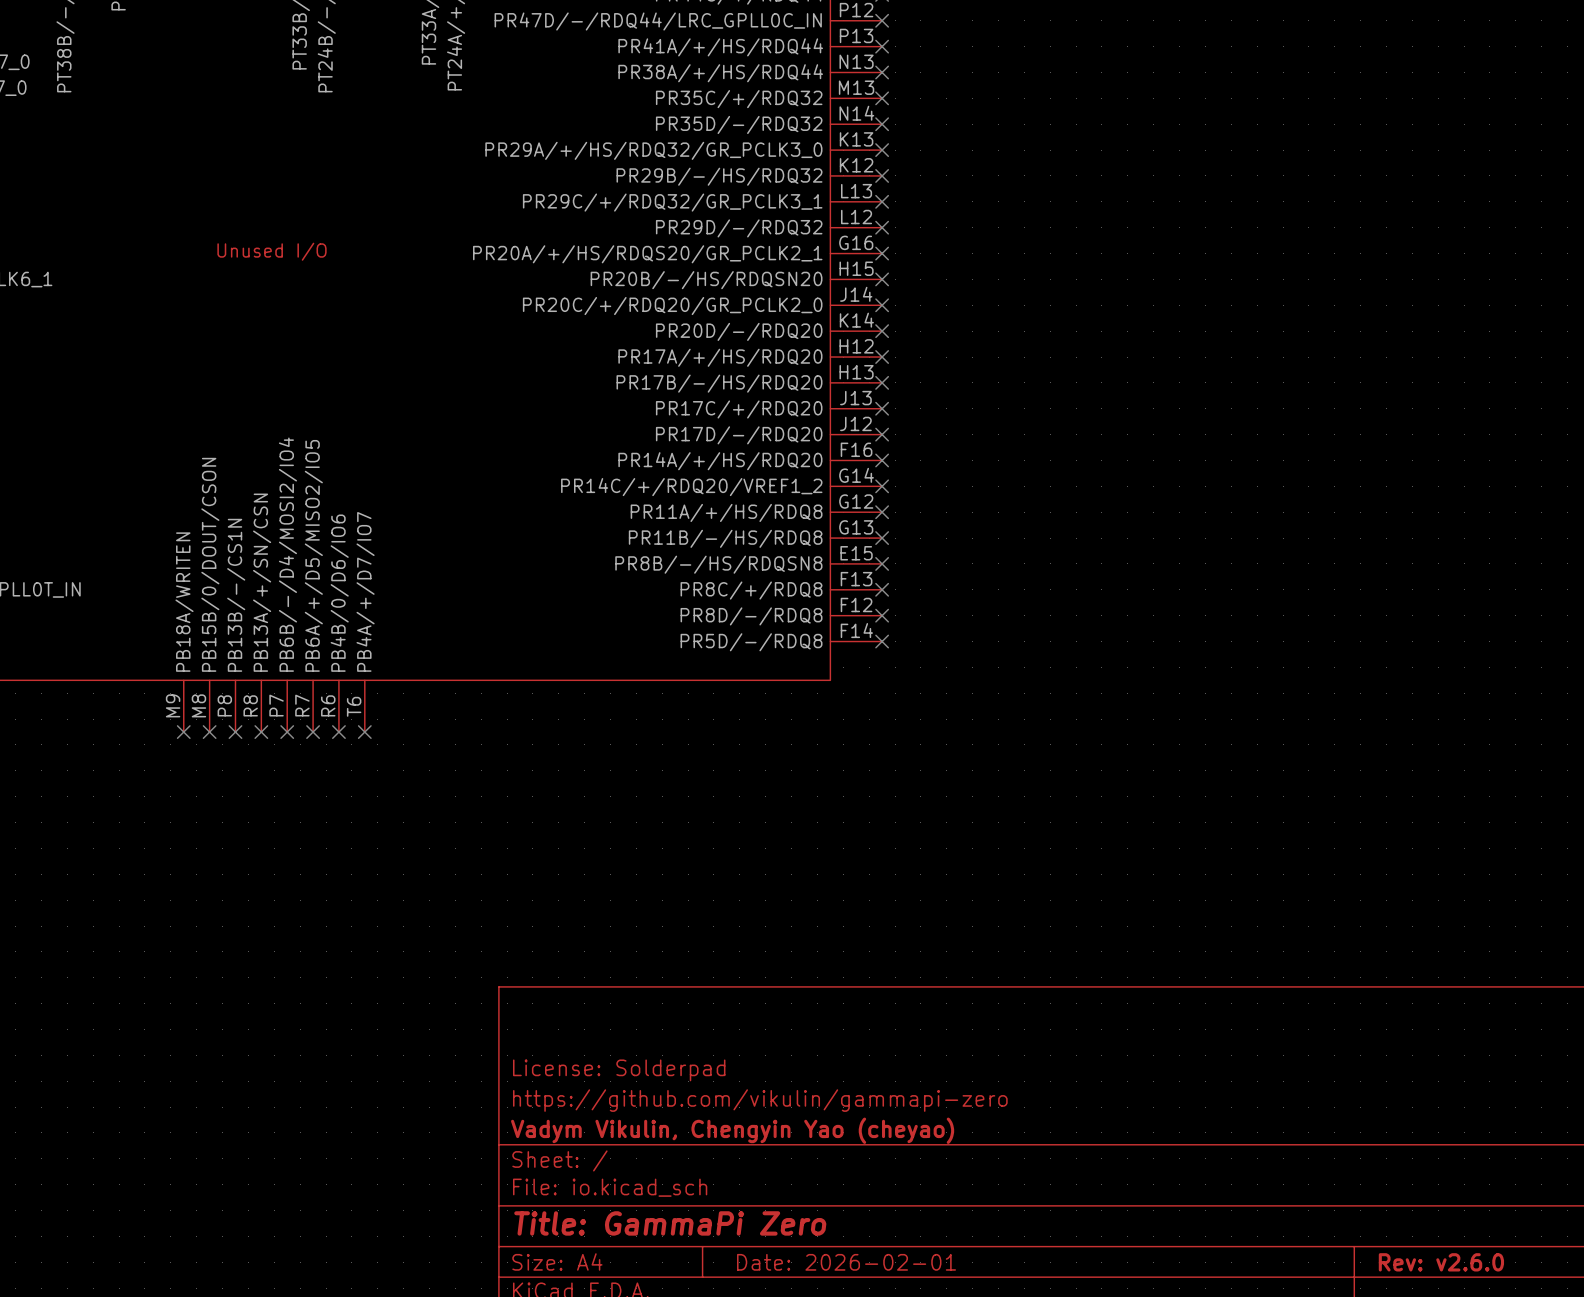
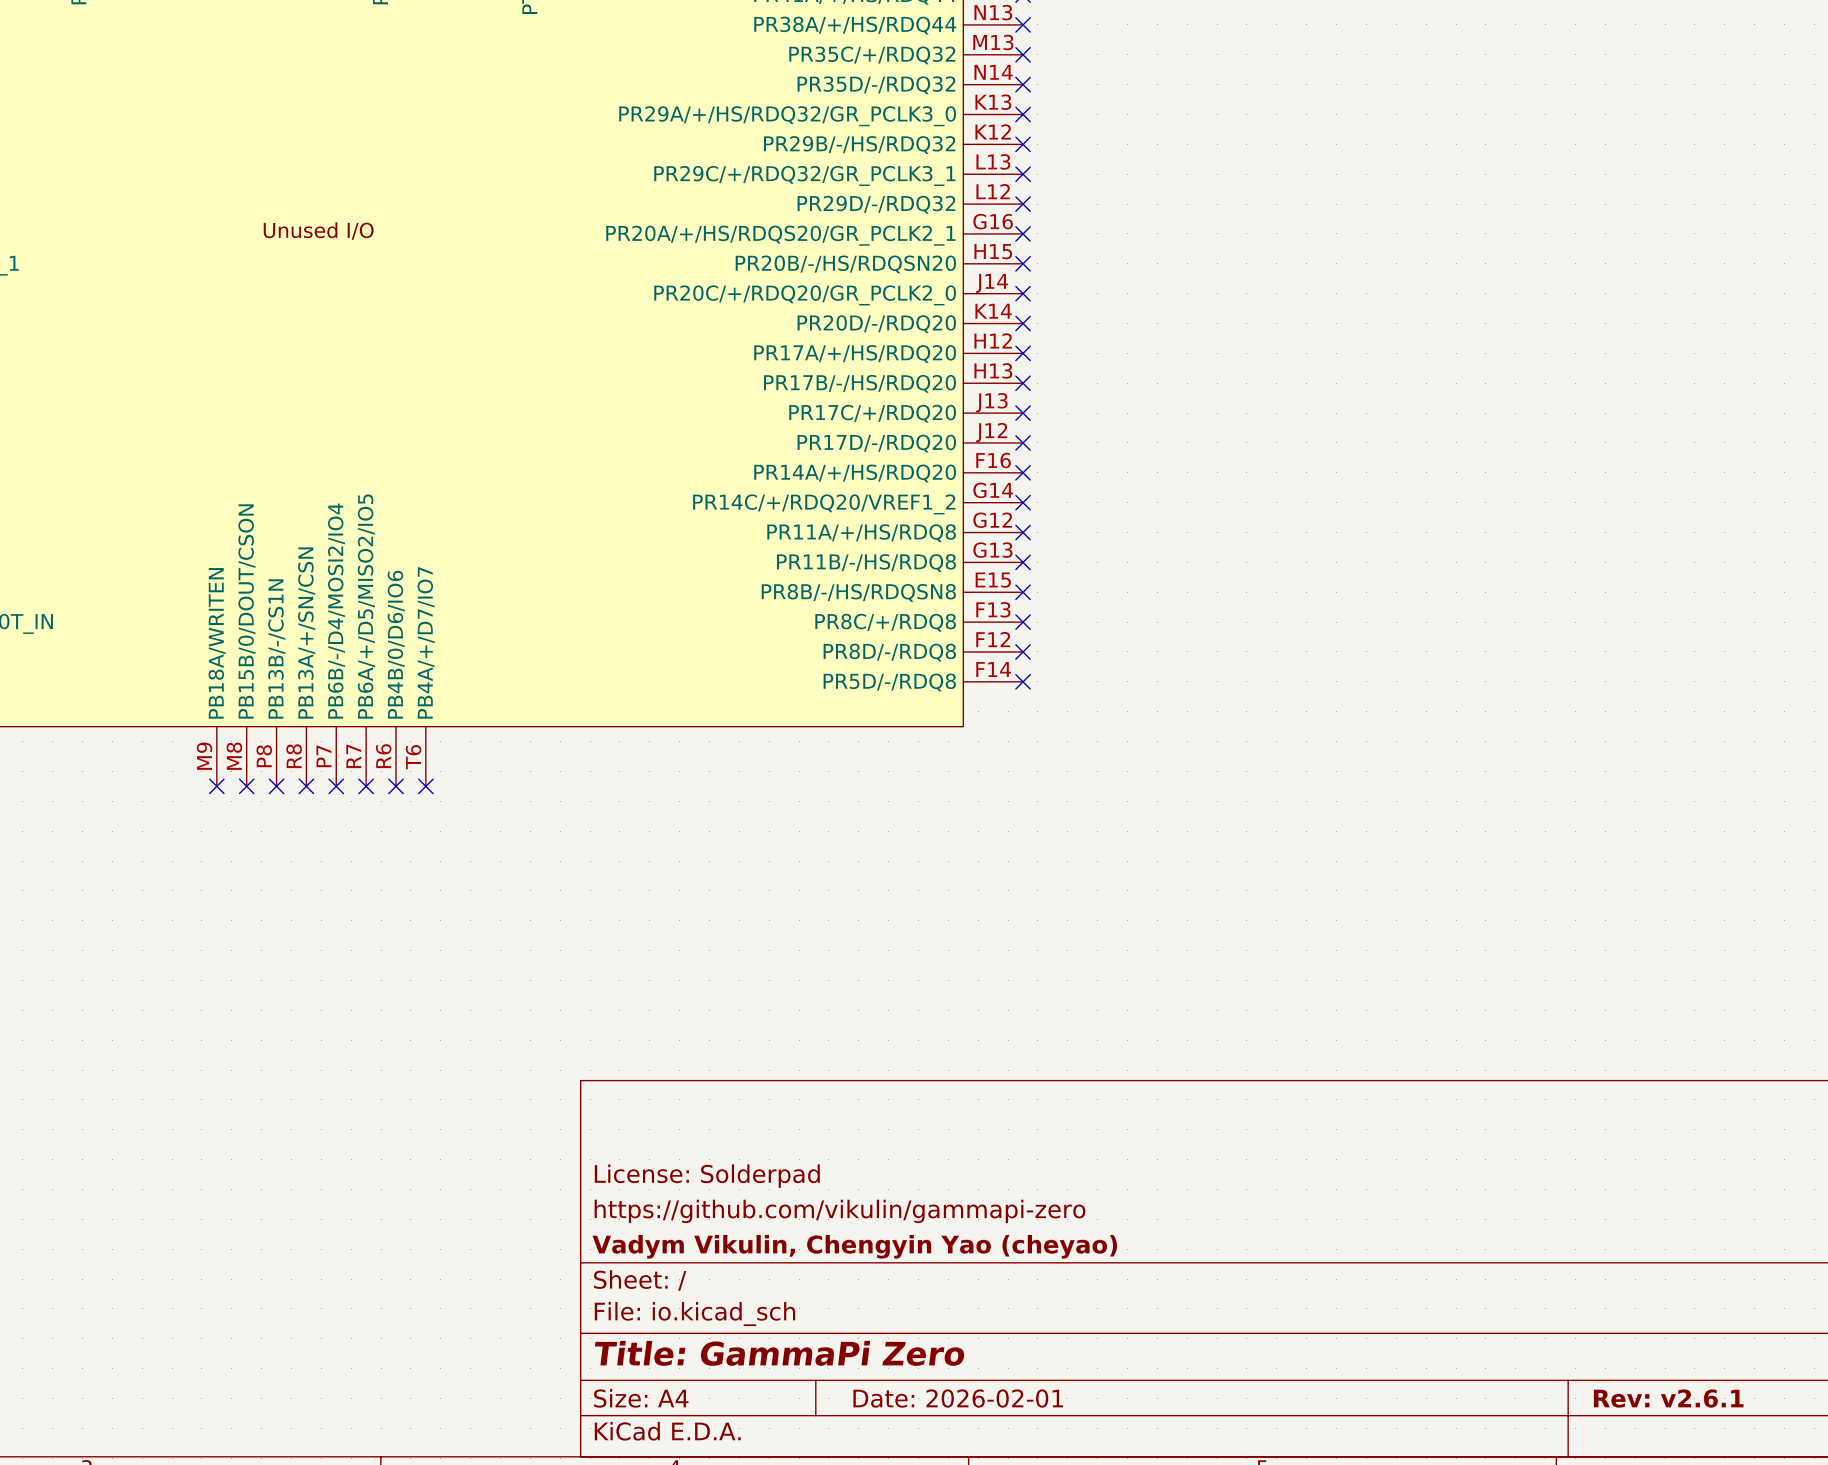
title block: Rev: v2.6.0 (1441, 1262) -> Rev: v2.6.1 (1668, 1398)

